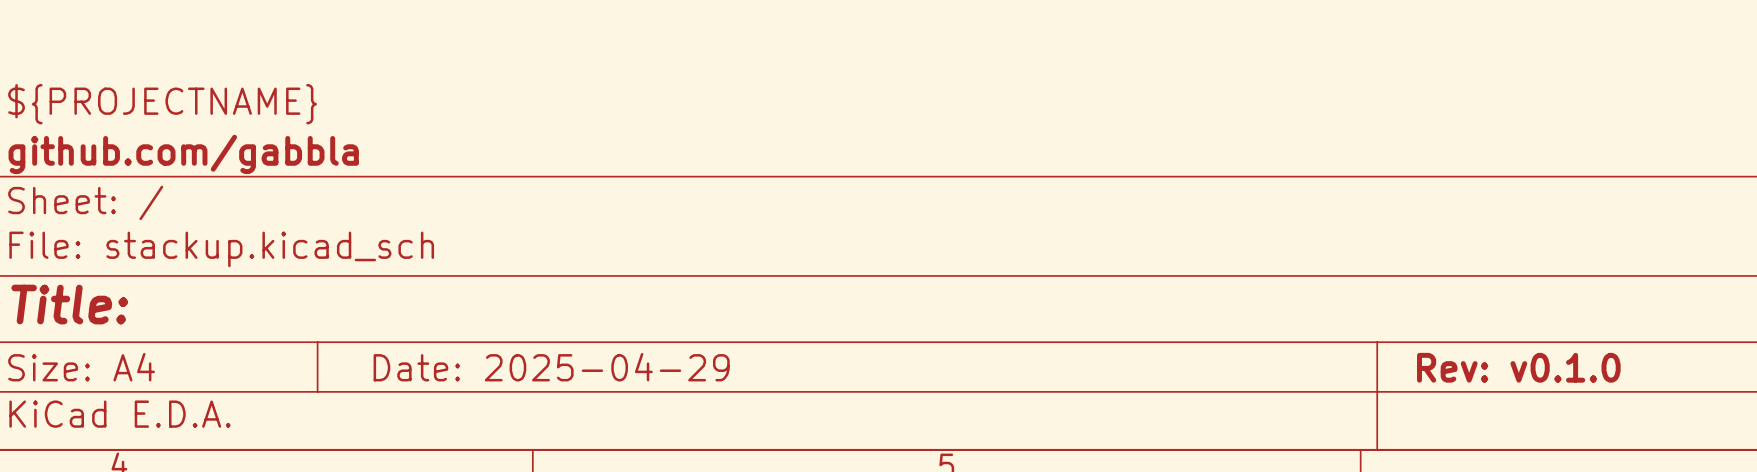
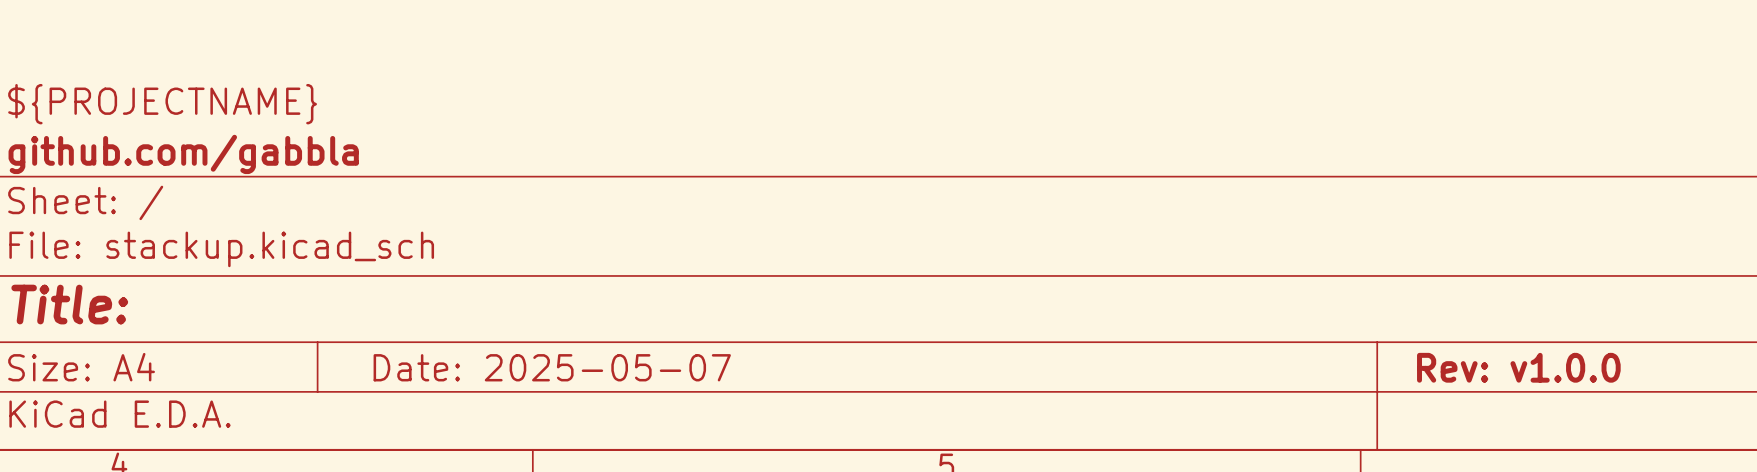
title block: Date: 2025-04-29 (551, 367) -> Date: 2025-05-07 (552, 367)
title block: Rev: v0.1.0 (1518, 367) -> Rev: v1.0.0 (1518, 367)

